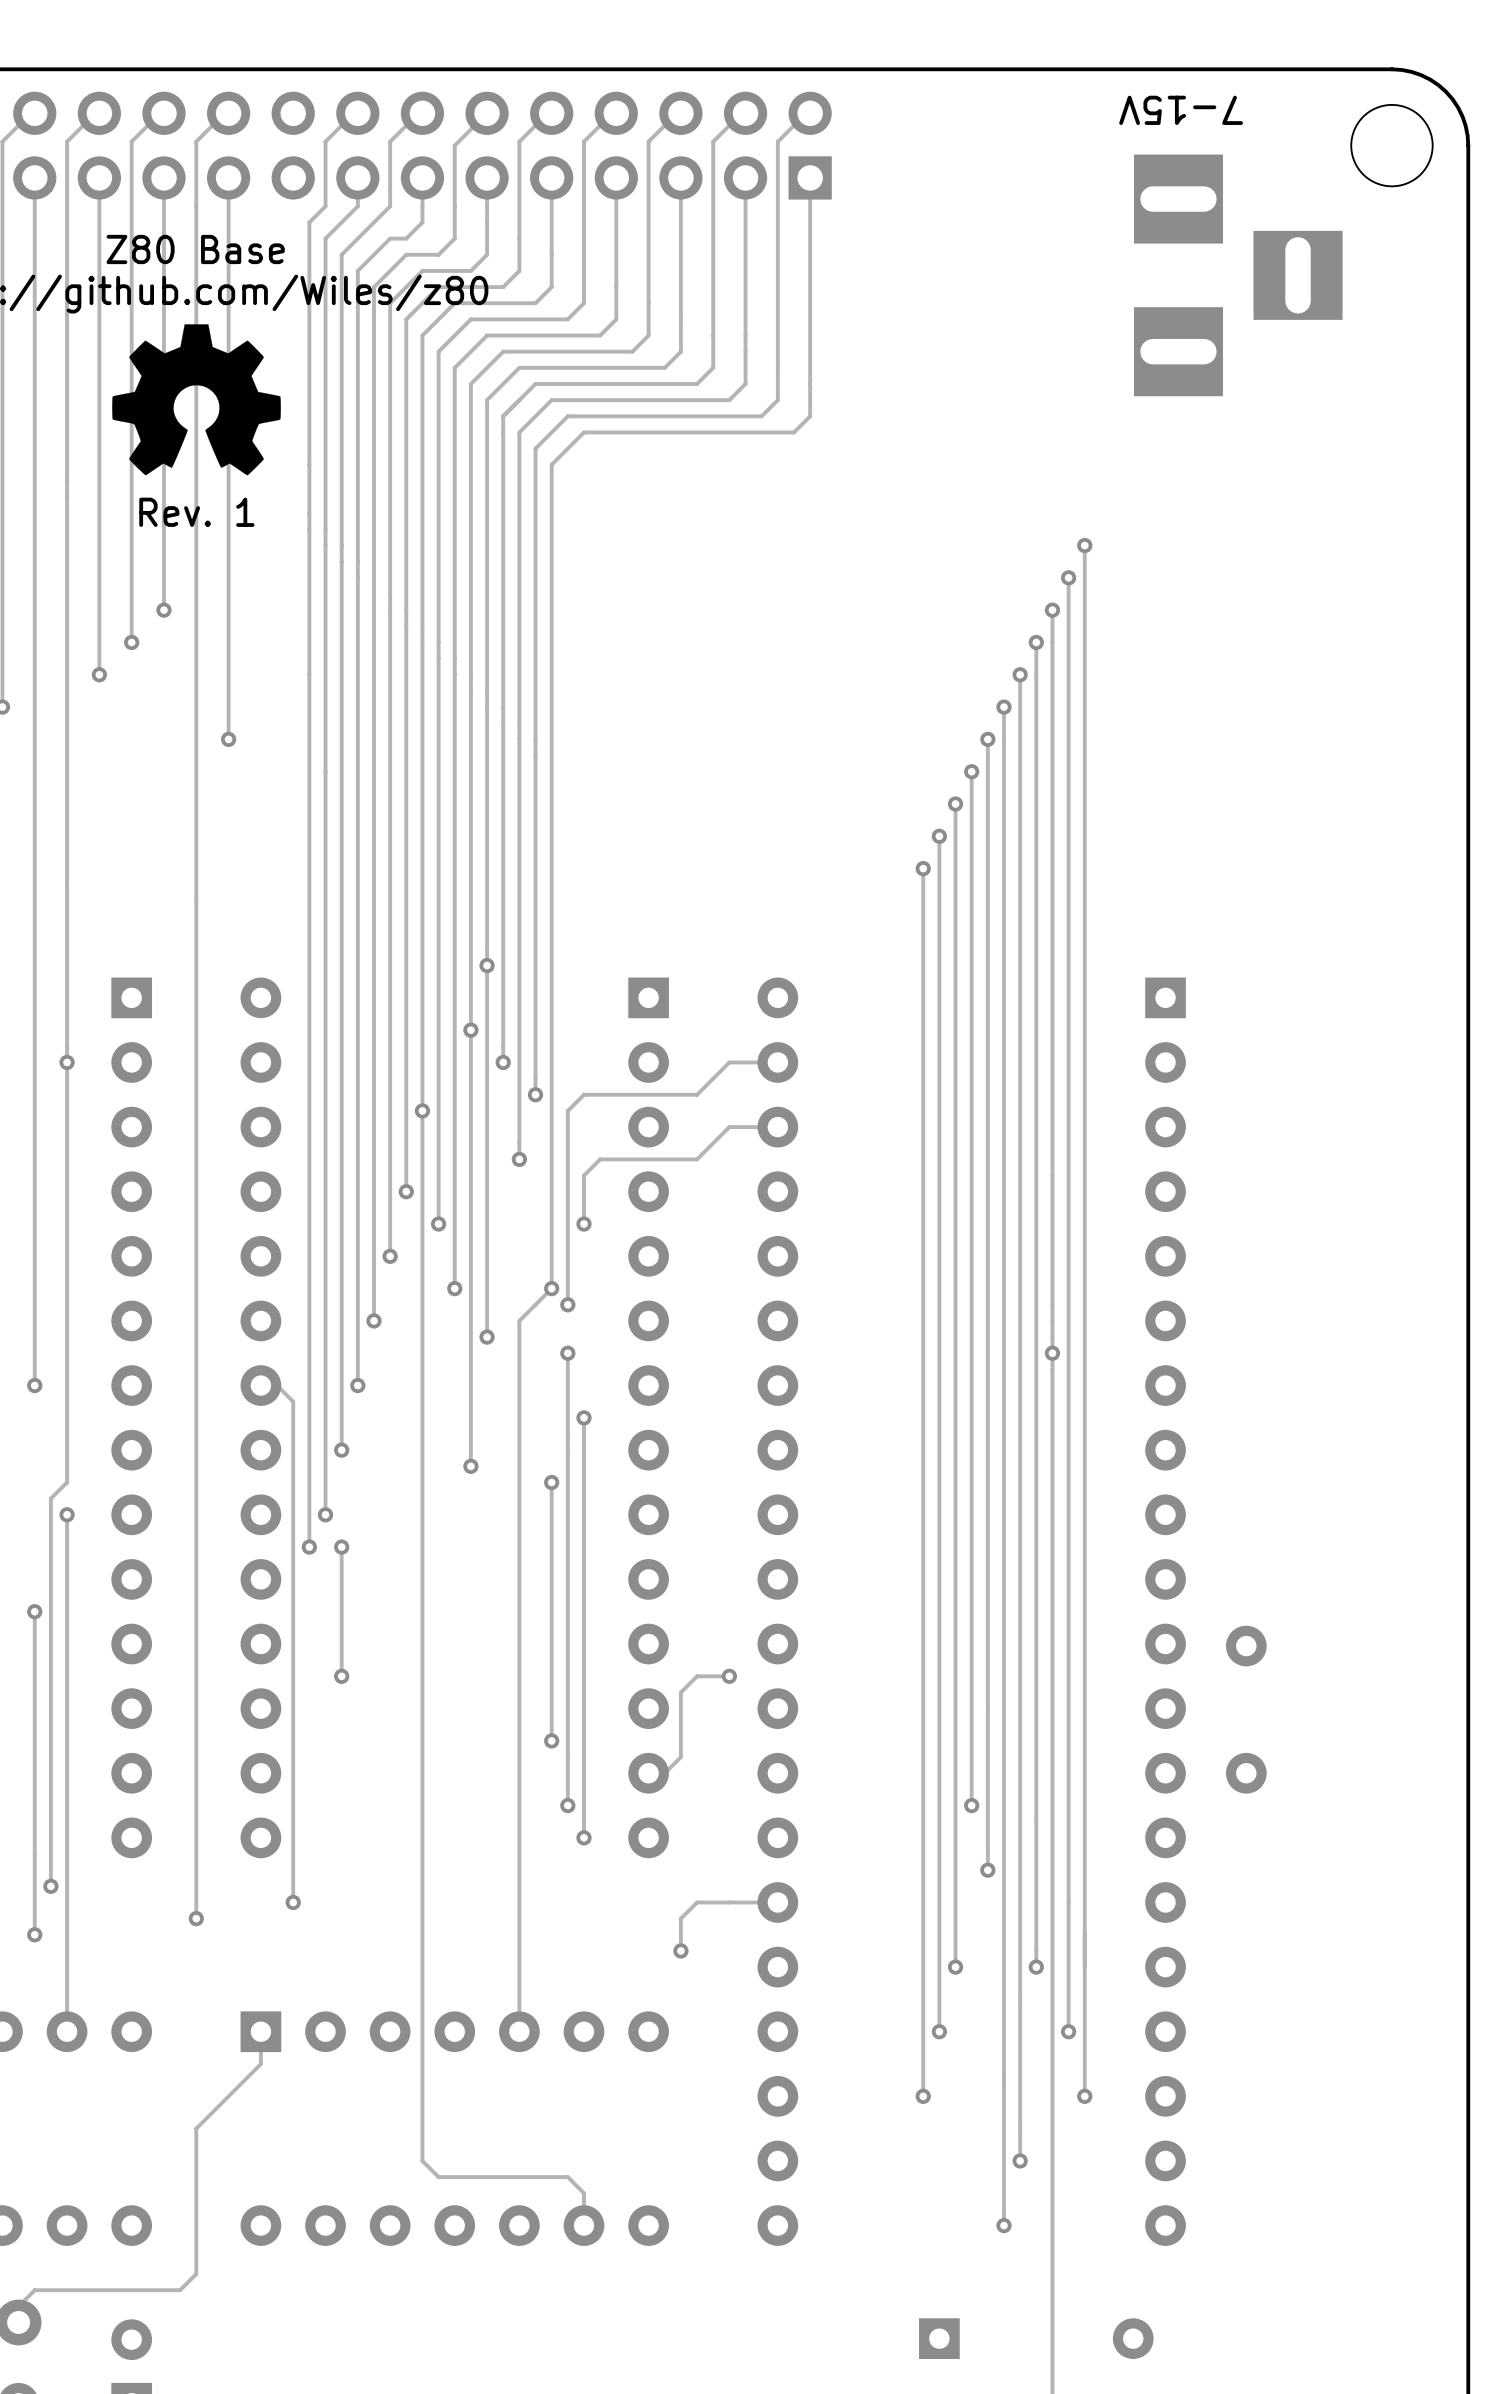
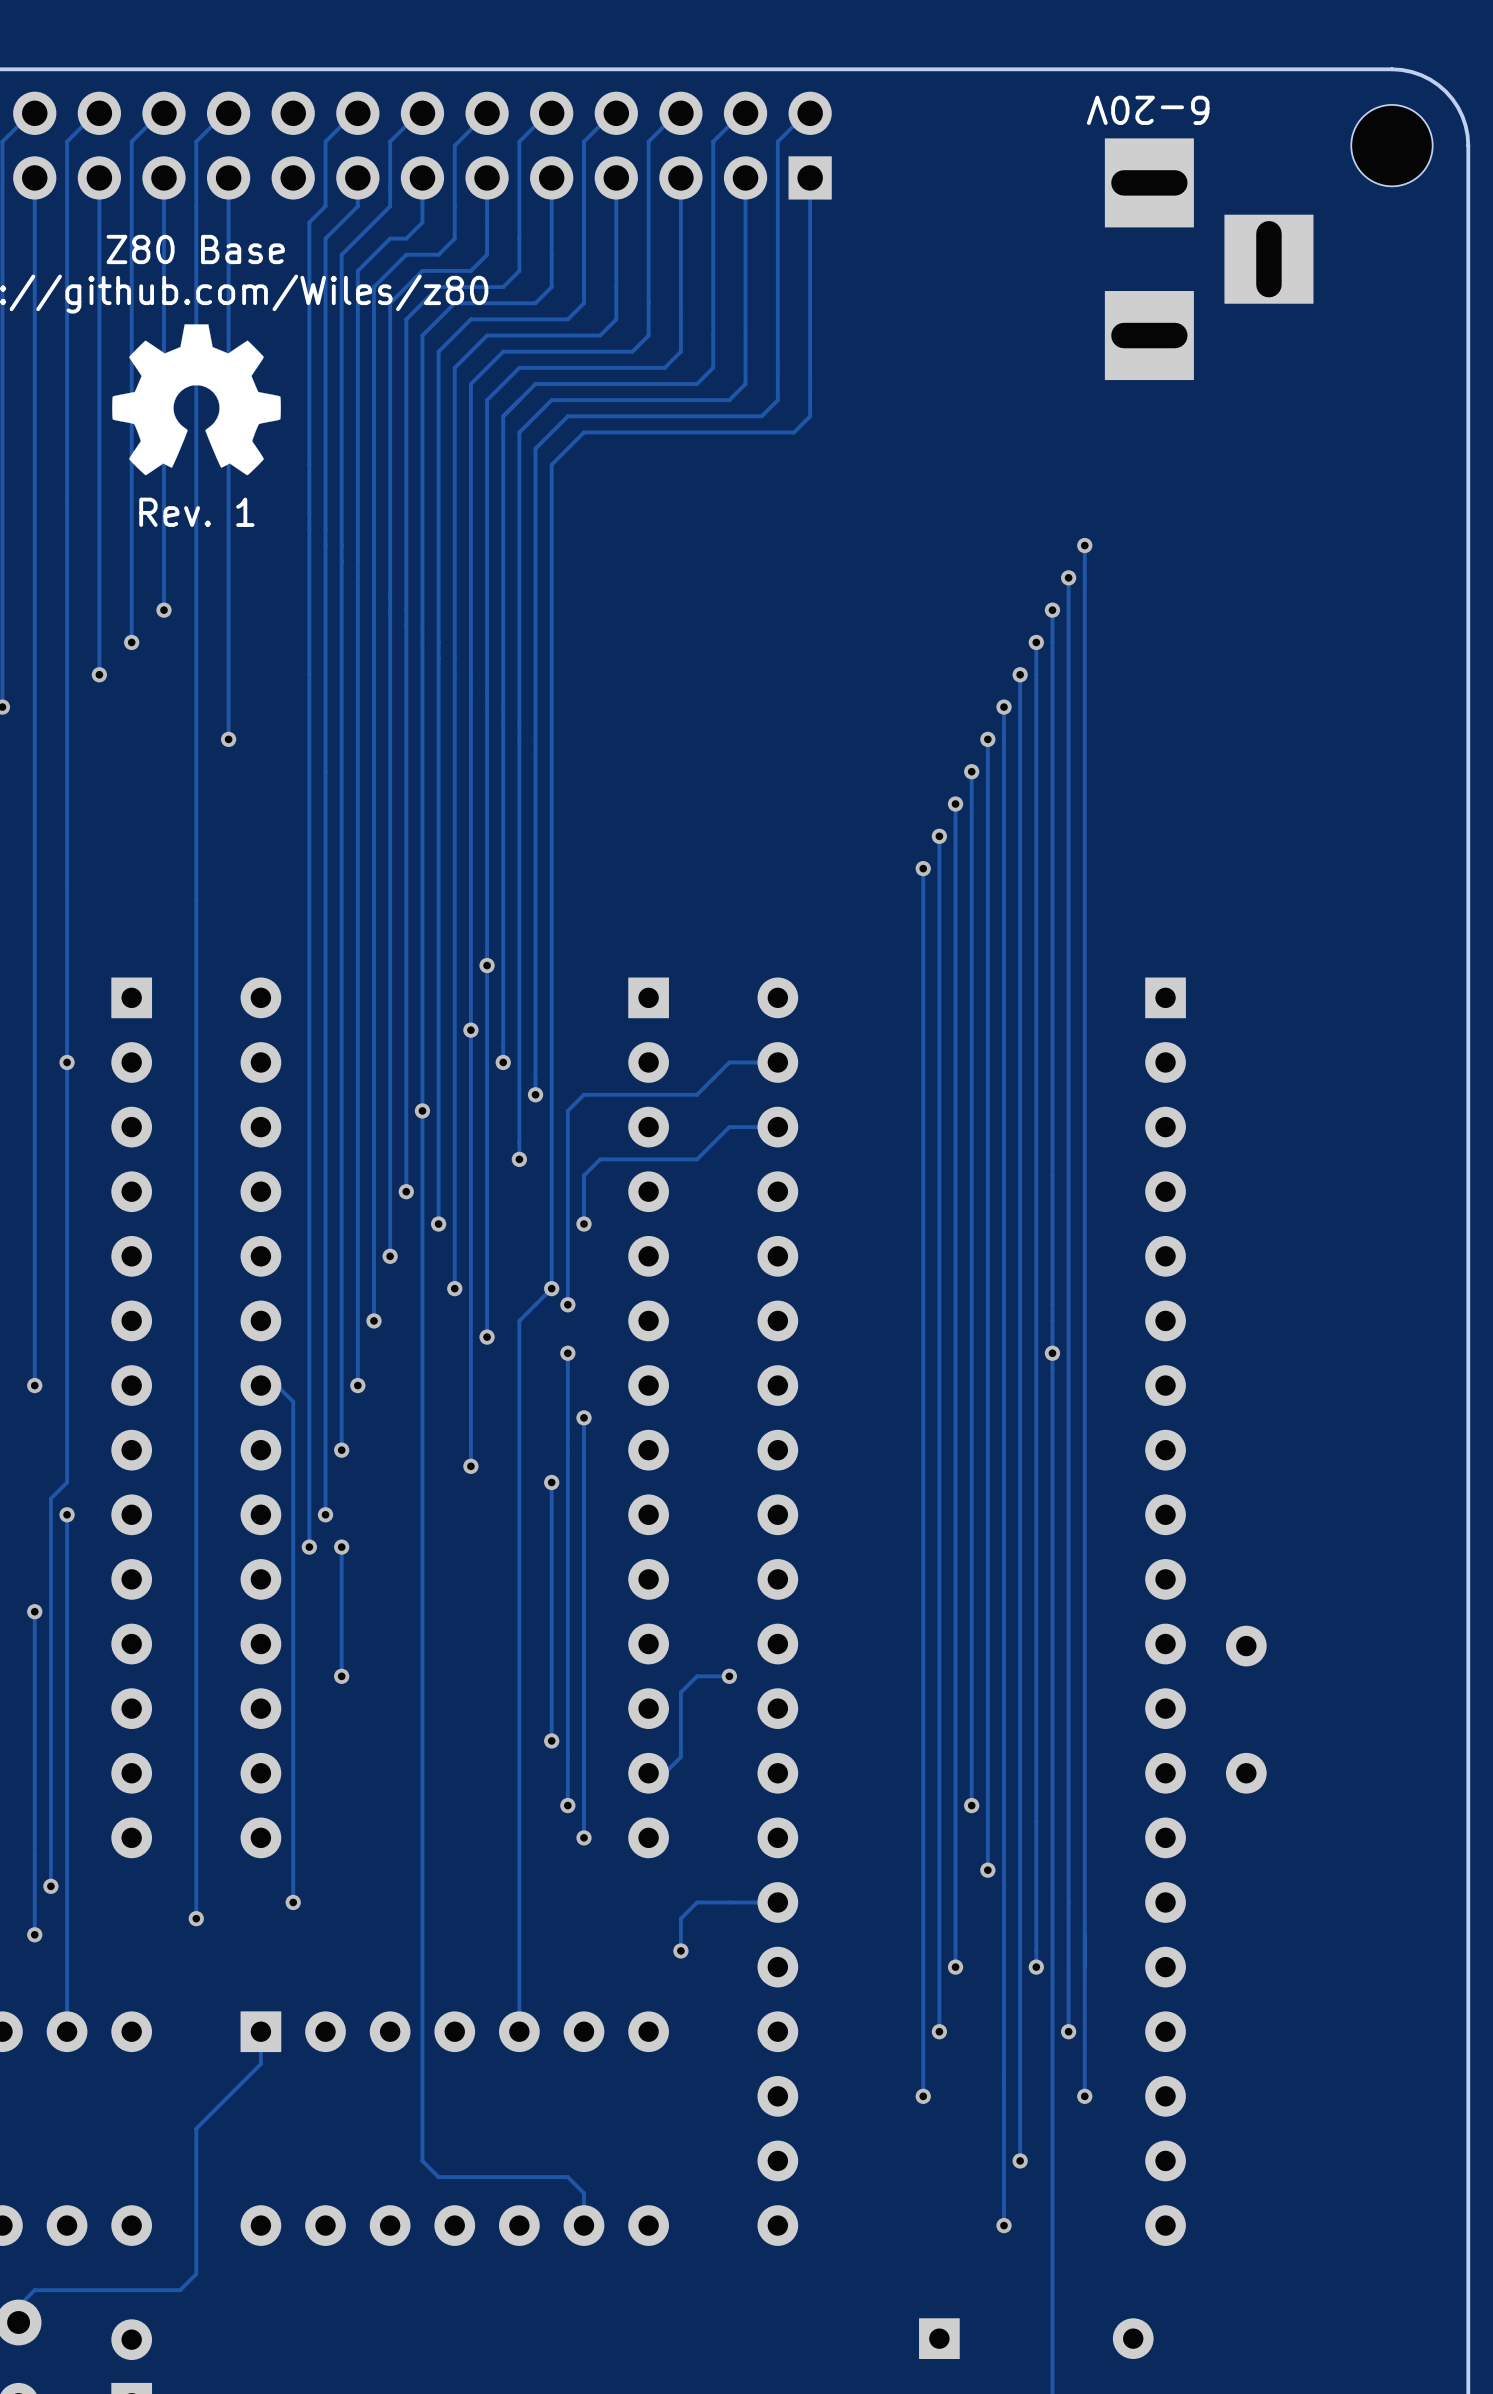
text: none -> 6-20V (1148, 110)
text: 7-15V (1181, 110) -> none
part position: (1238, 275) -> (1209, 259)

